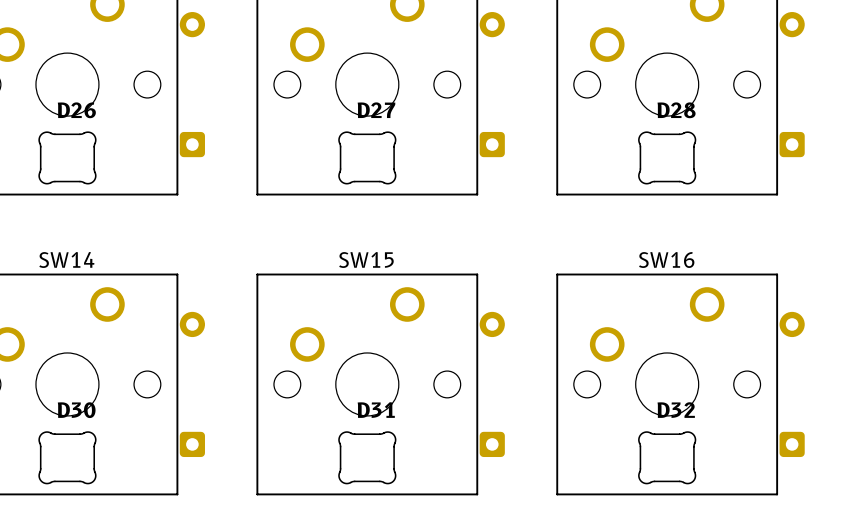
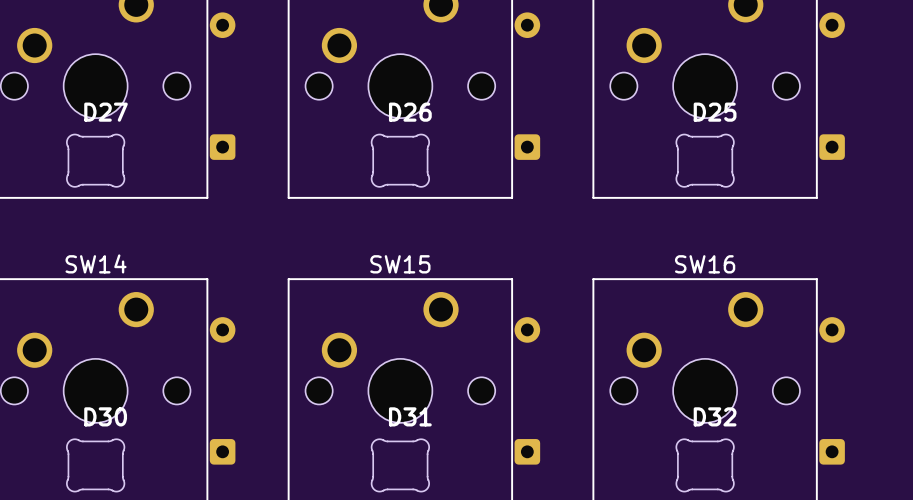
D26 name: D26 (76, 110) -> D27 (106, 112)
D27 name: D27 (376, 110) -> D26 (410, 112)
D28 name: D28 (676, 110) -> D25 (715, 112)

